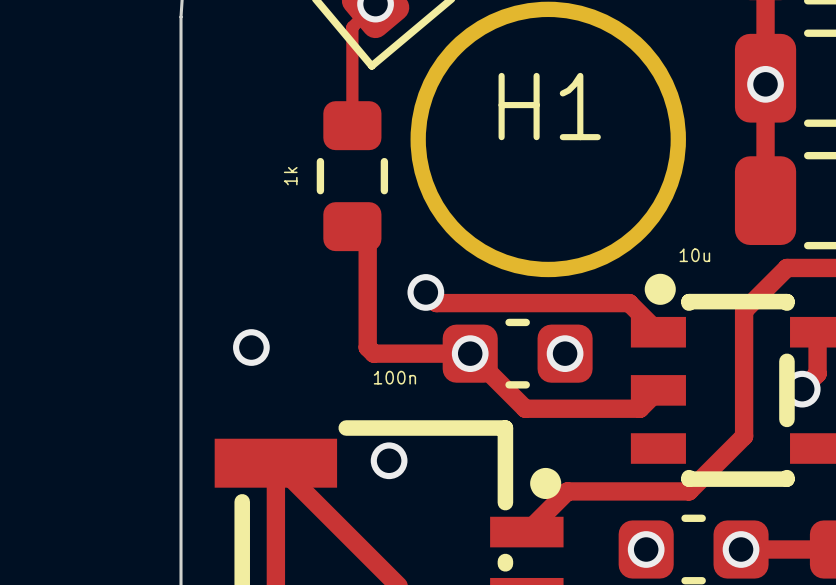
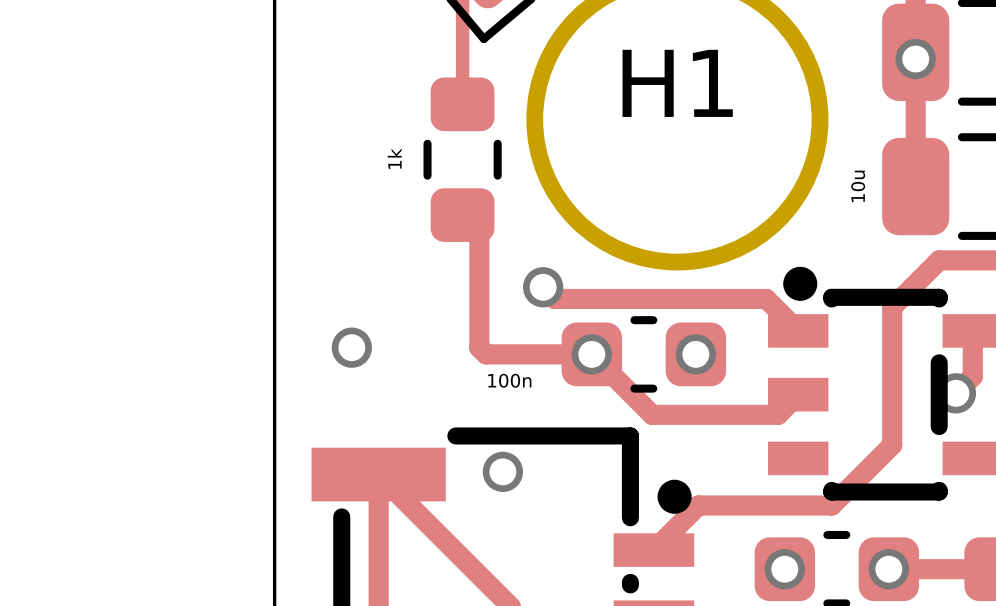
10u name rotation: 0° (694, 255) -> 90° counterclockwise (858, 186)
10u name position: 10u (694, 255) -> 10u (858, 186)

